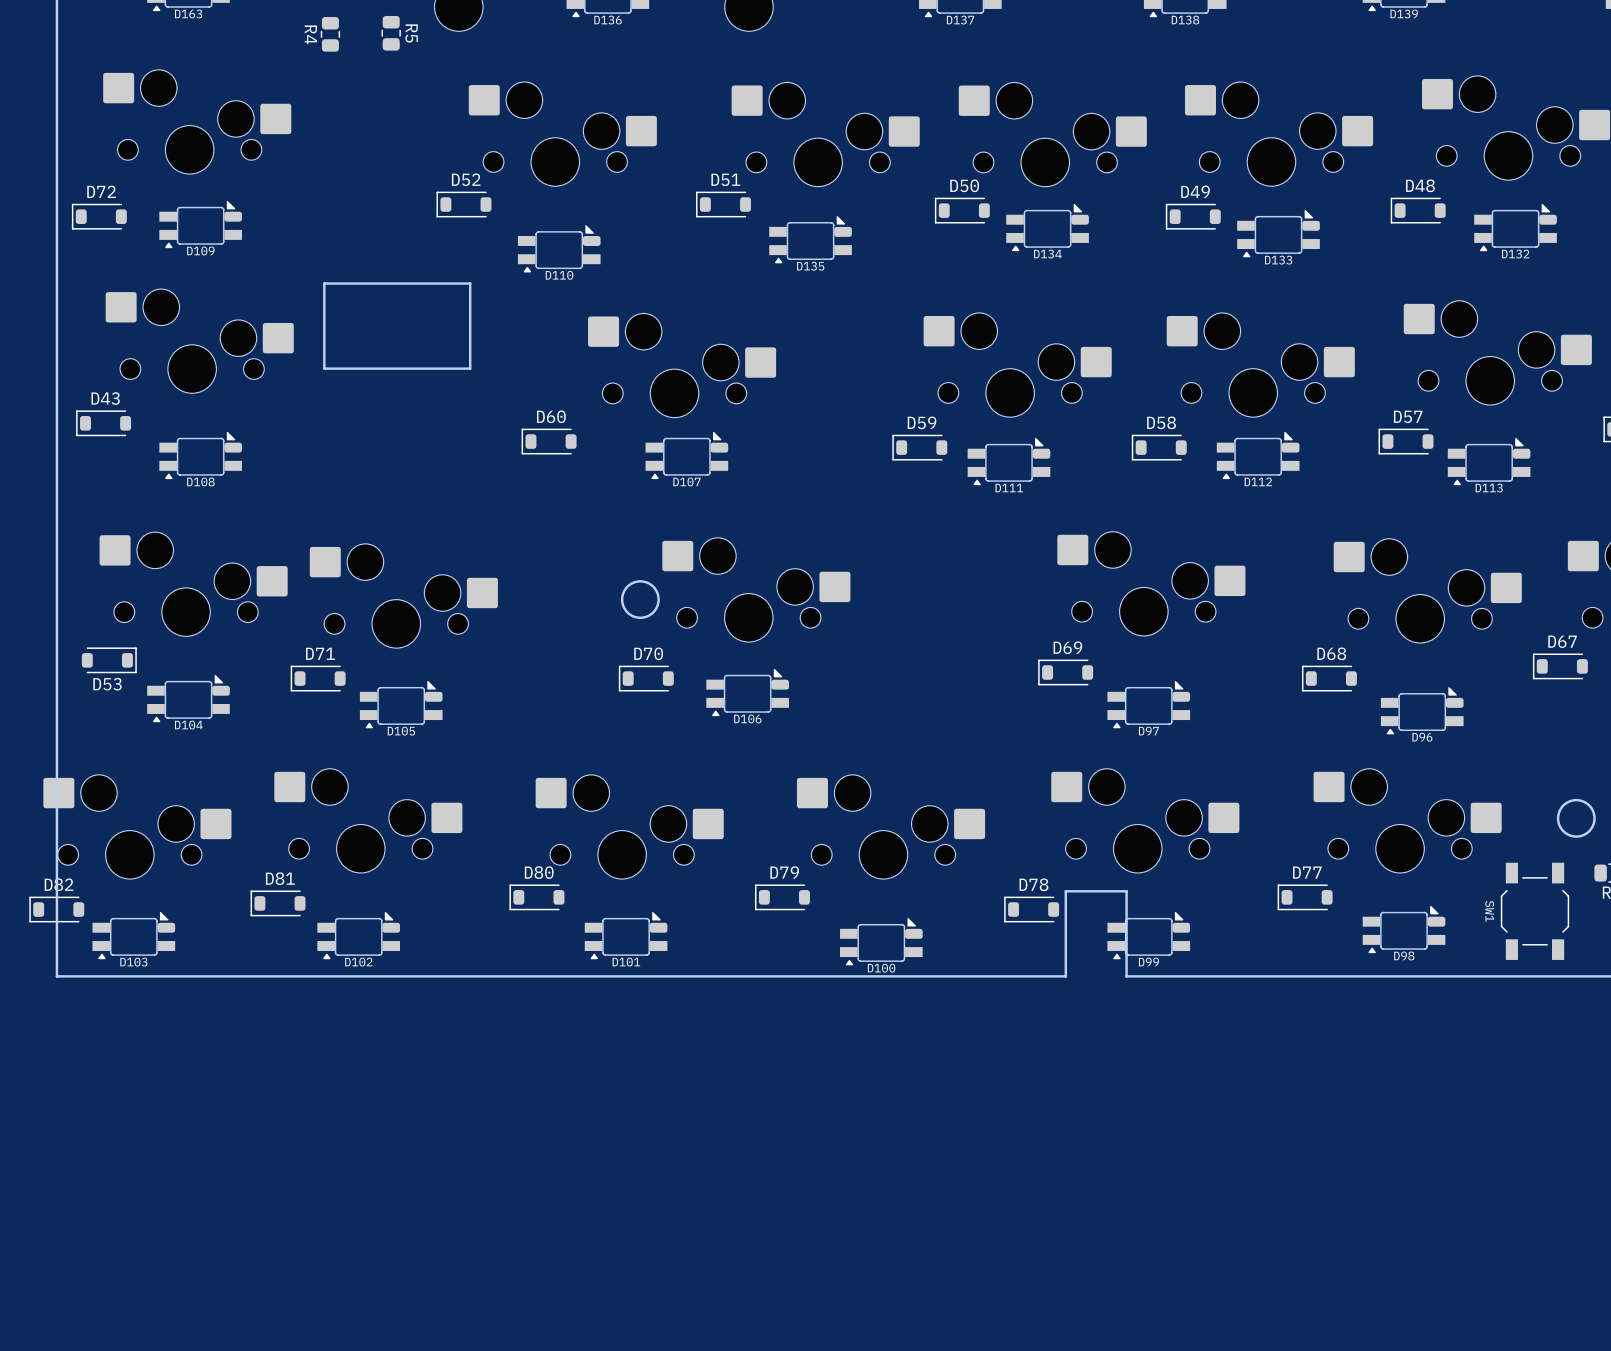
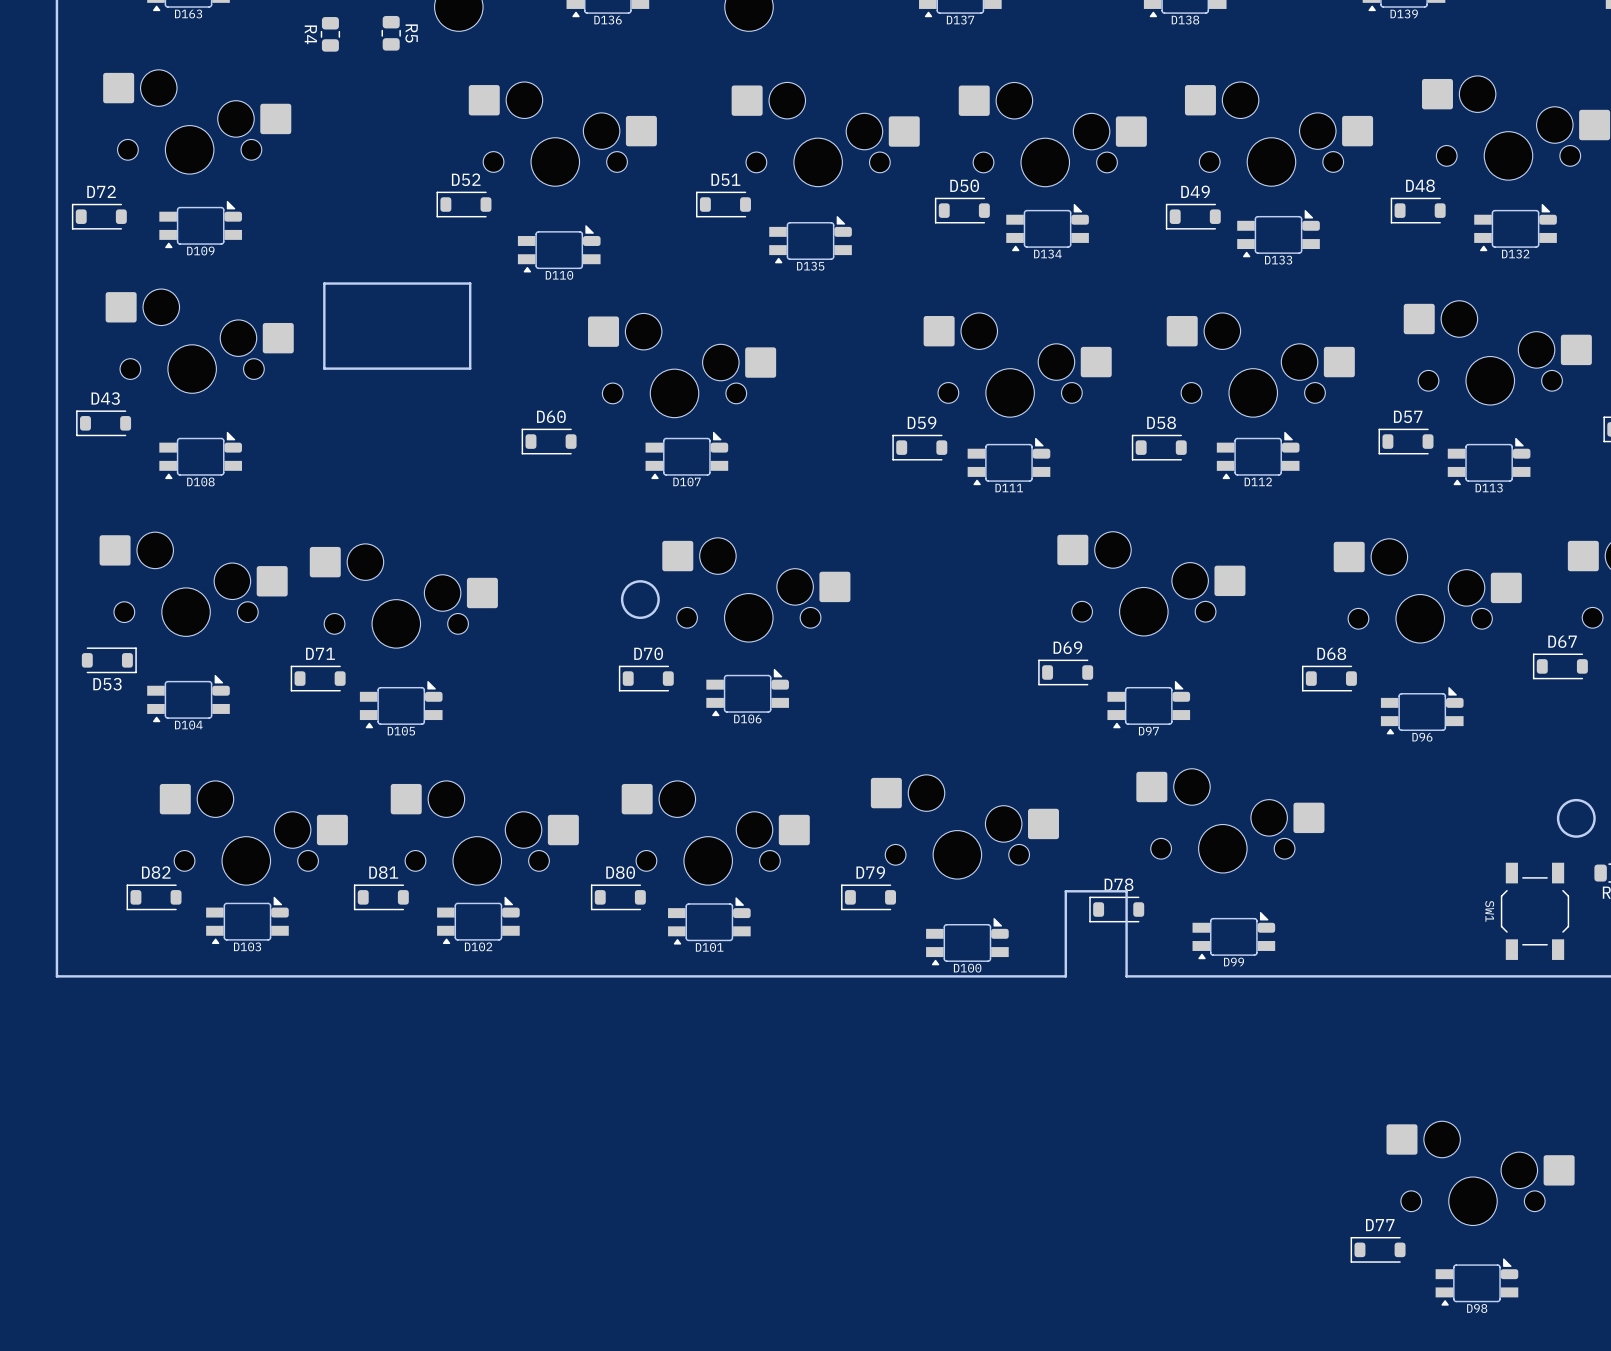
part: (368, 820) -> none
part position: (1145, 820) -> (1230, 820)
part: (1407, 820) -> none
part: (137, 826) -> none
part: (629, 826) -> none
part position: (891, 826) -> (964, 826)
part: none -> (253, 833)
part: none -> (484, 833)
part: none -> (715, 833)
D80 position: (536, 897) -> (618, 897)
D79 position: (782, 897) -> (868, 897)
D77 position: (1305, 897) -> (1378, 1249)
D81 position: (278, 903) -> (381, 897)
D82 position: (56, 909) -> (154, 897)
D78 position: (1031, 909) -> (1116, 909)
D98 position: (1404, 929) -> (1476, 1282)
D103 position: (133, 935) -> (247, 920)
D102 position: (358, 935) -> (478, 920)
D101 position: (626, 935) -> (709, 920)
D99 position: (1148, 935) -> (1233, 935)
D100 position: (881, 941) -> (967, 941)
part: none -> (1480, 1173)

